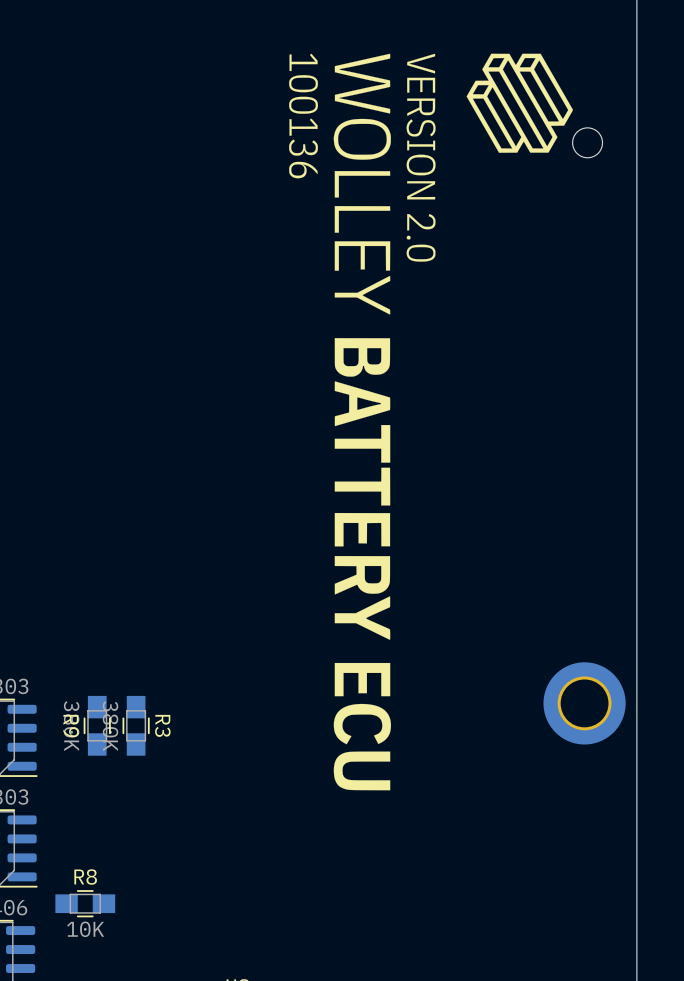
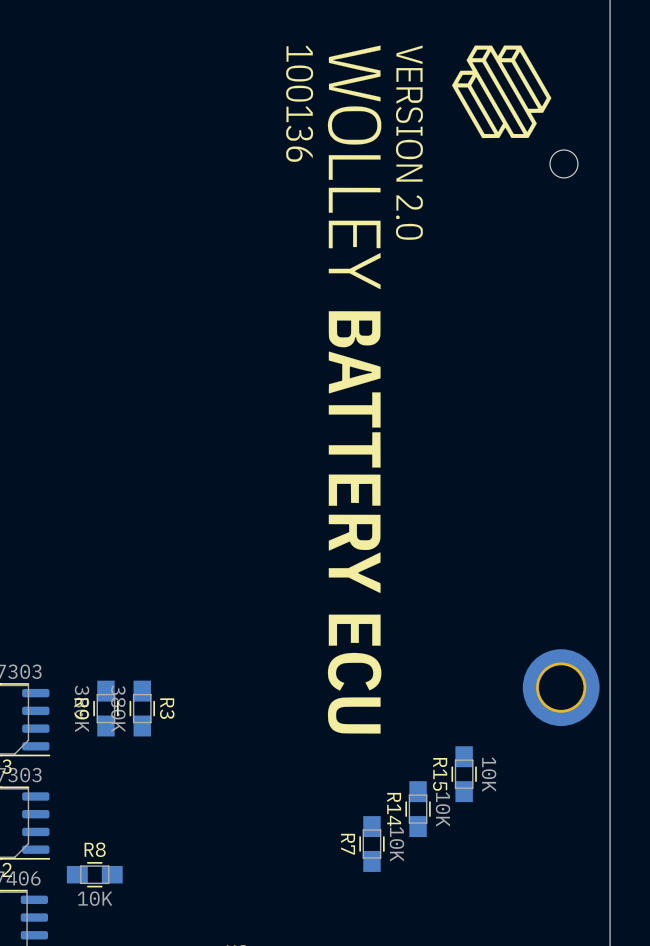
drawing position: (431, 422) -> (418, 389)
R15: none -> 10K (464, 774)
R14: none -> 10K (418, 809)
R7: none -> 10K (371, 844)

